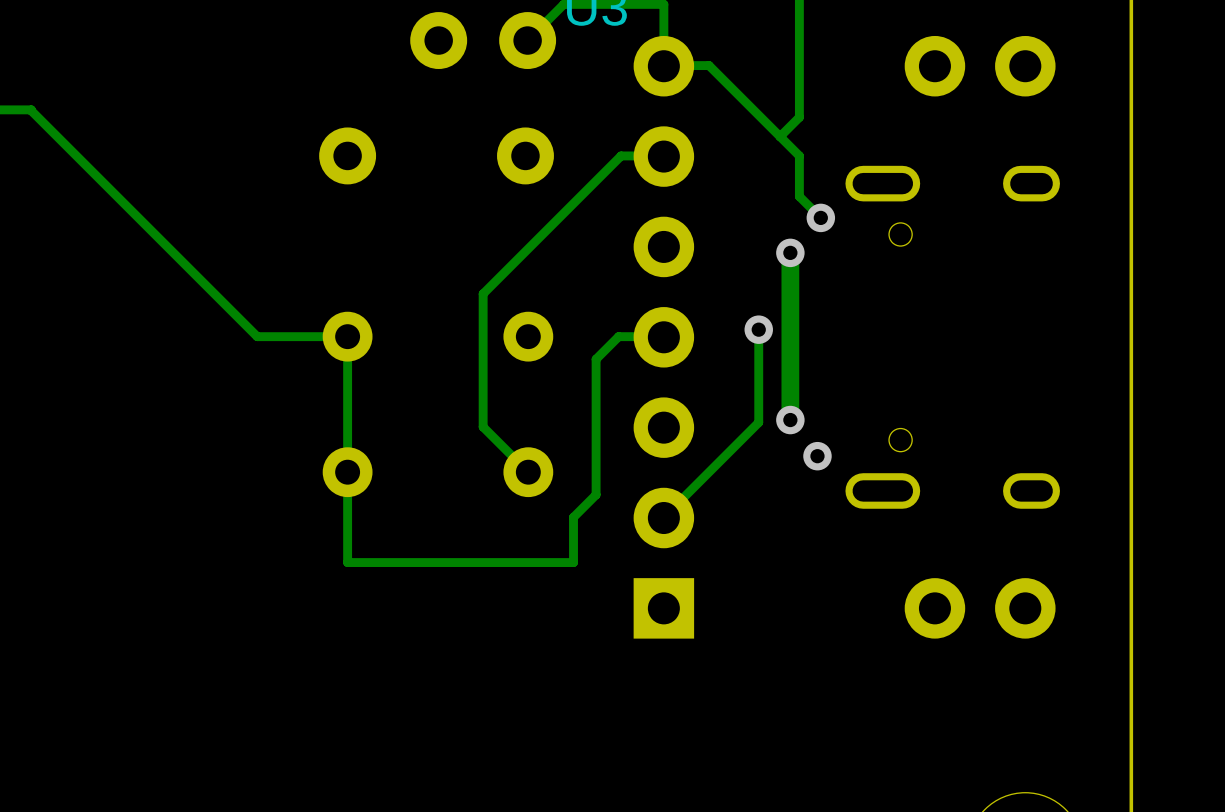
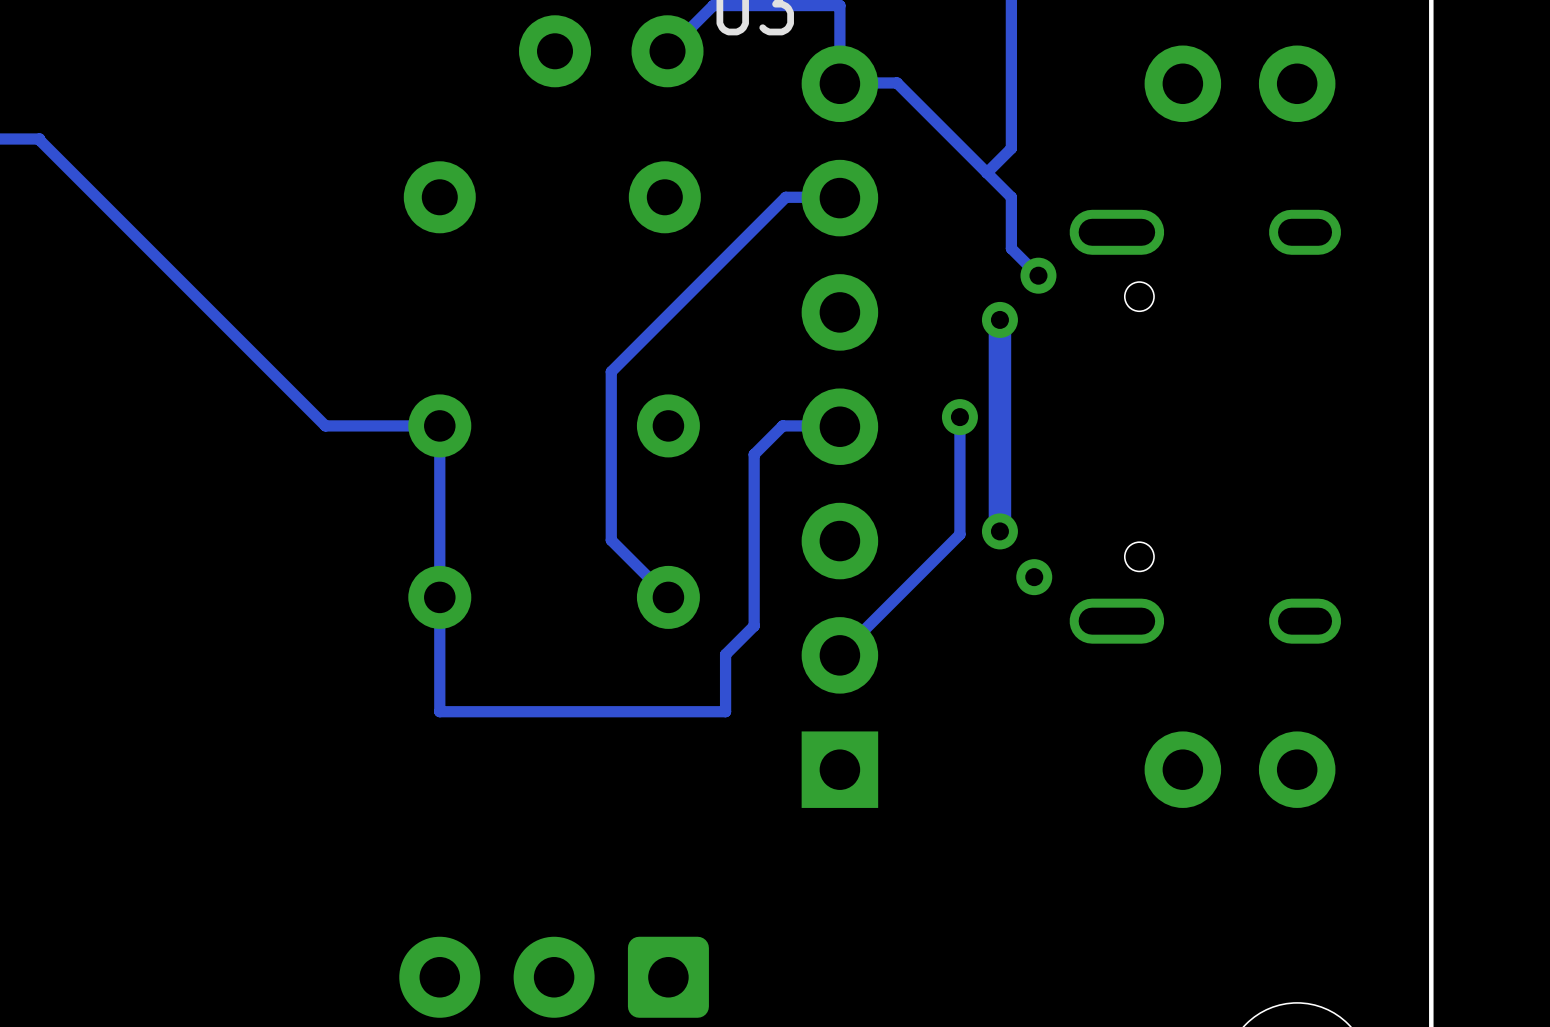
part: none -> (554, 977)

